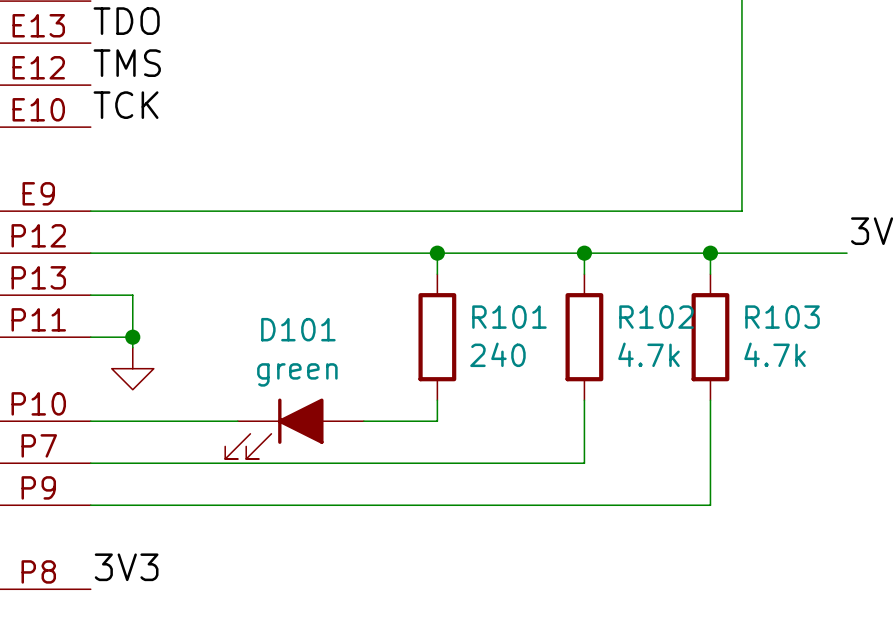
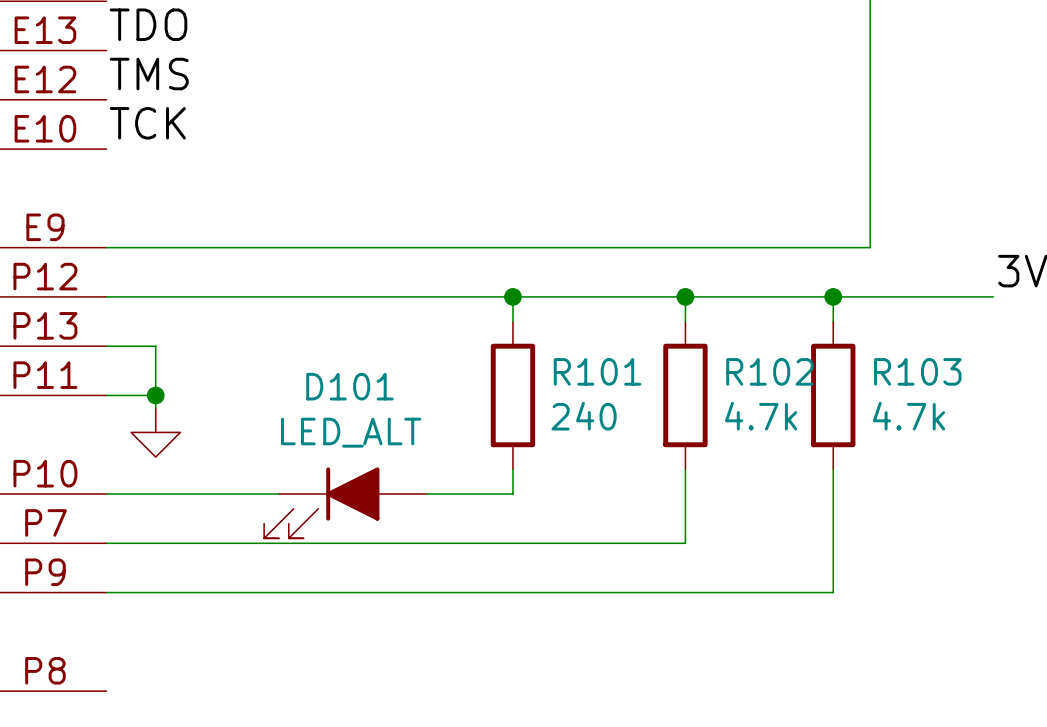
D101 value: green (297, 374) -> LED_ALT (351, 432)
label: 3V3 (126, 567) -> none

